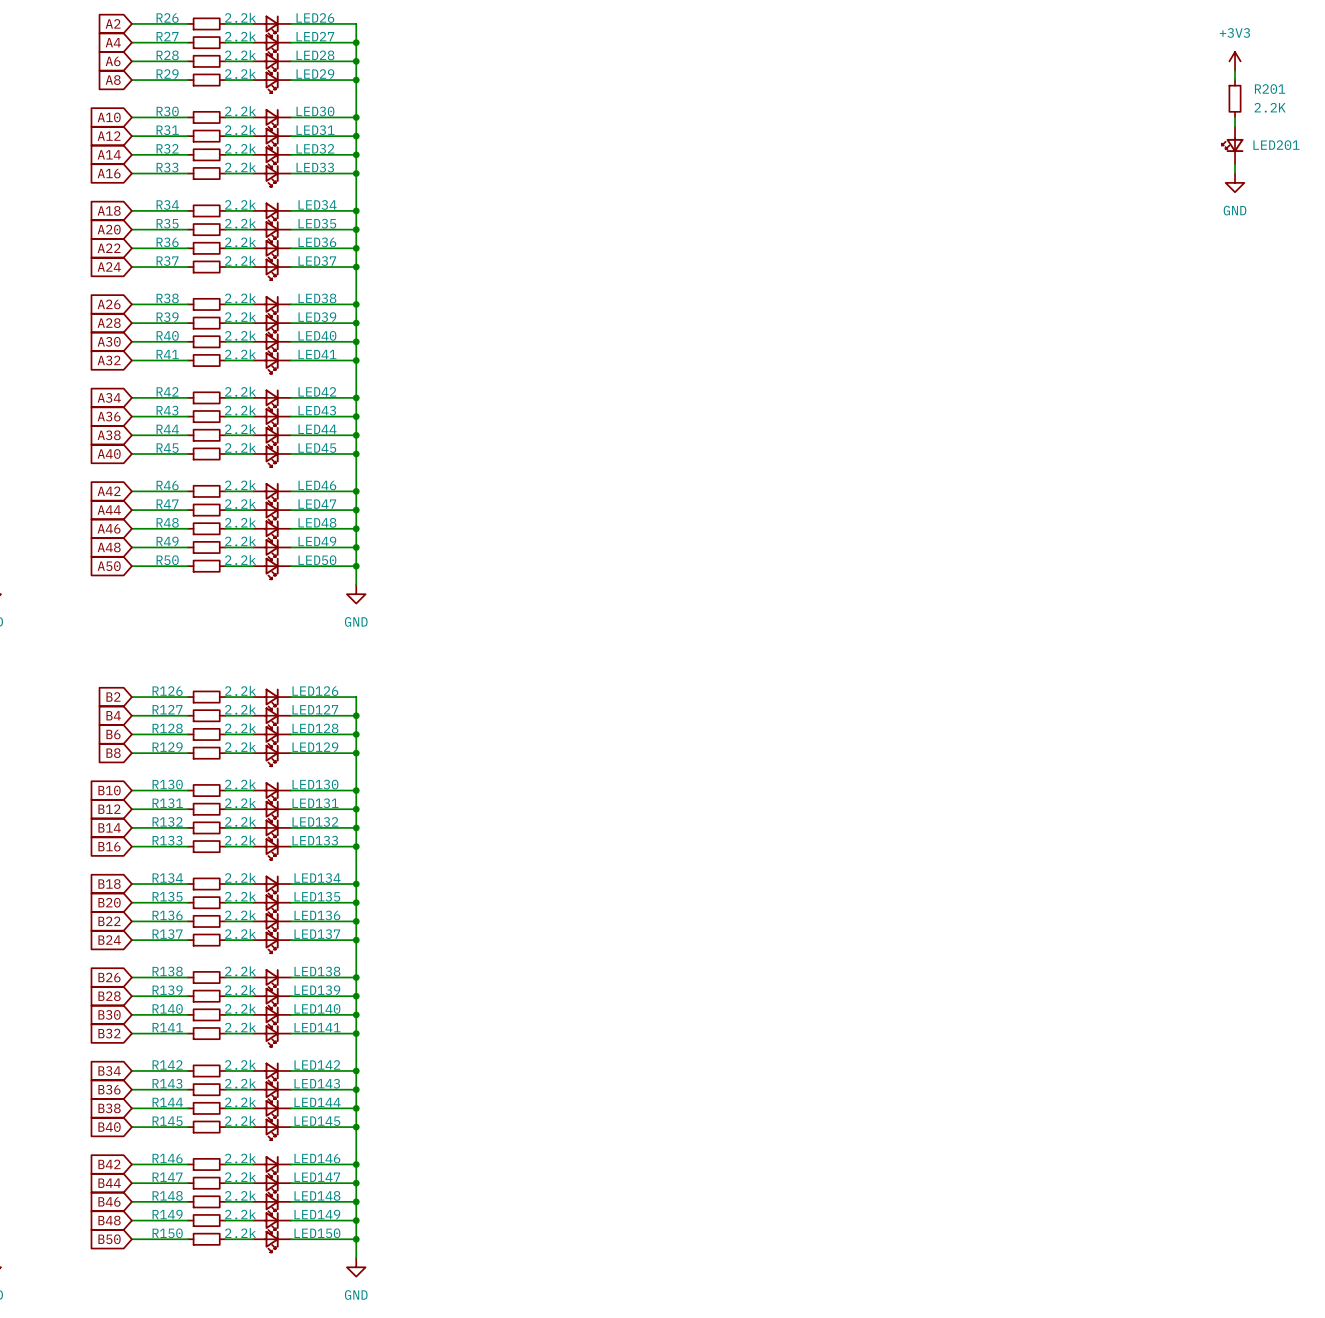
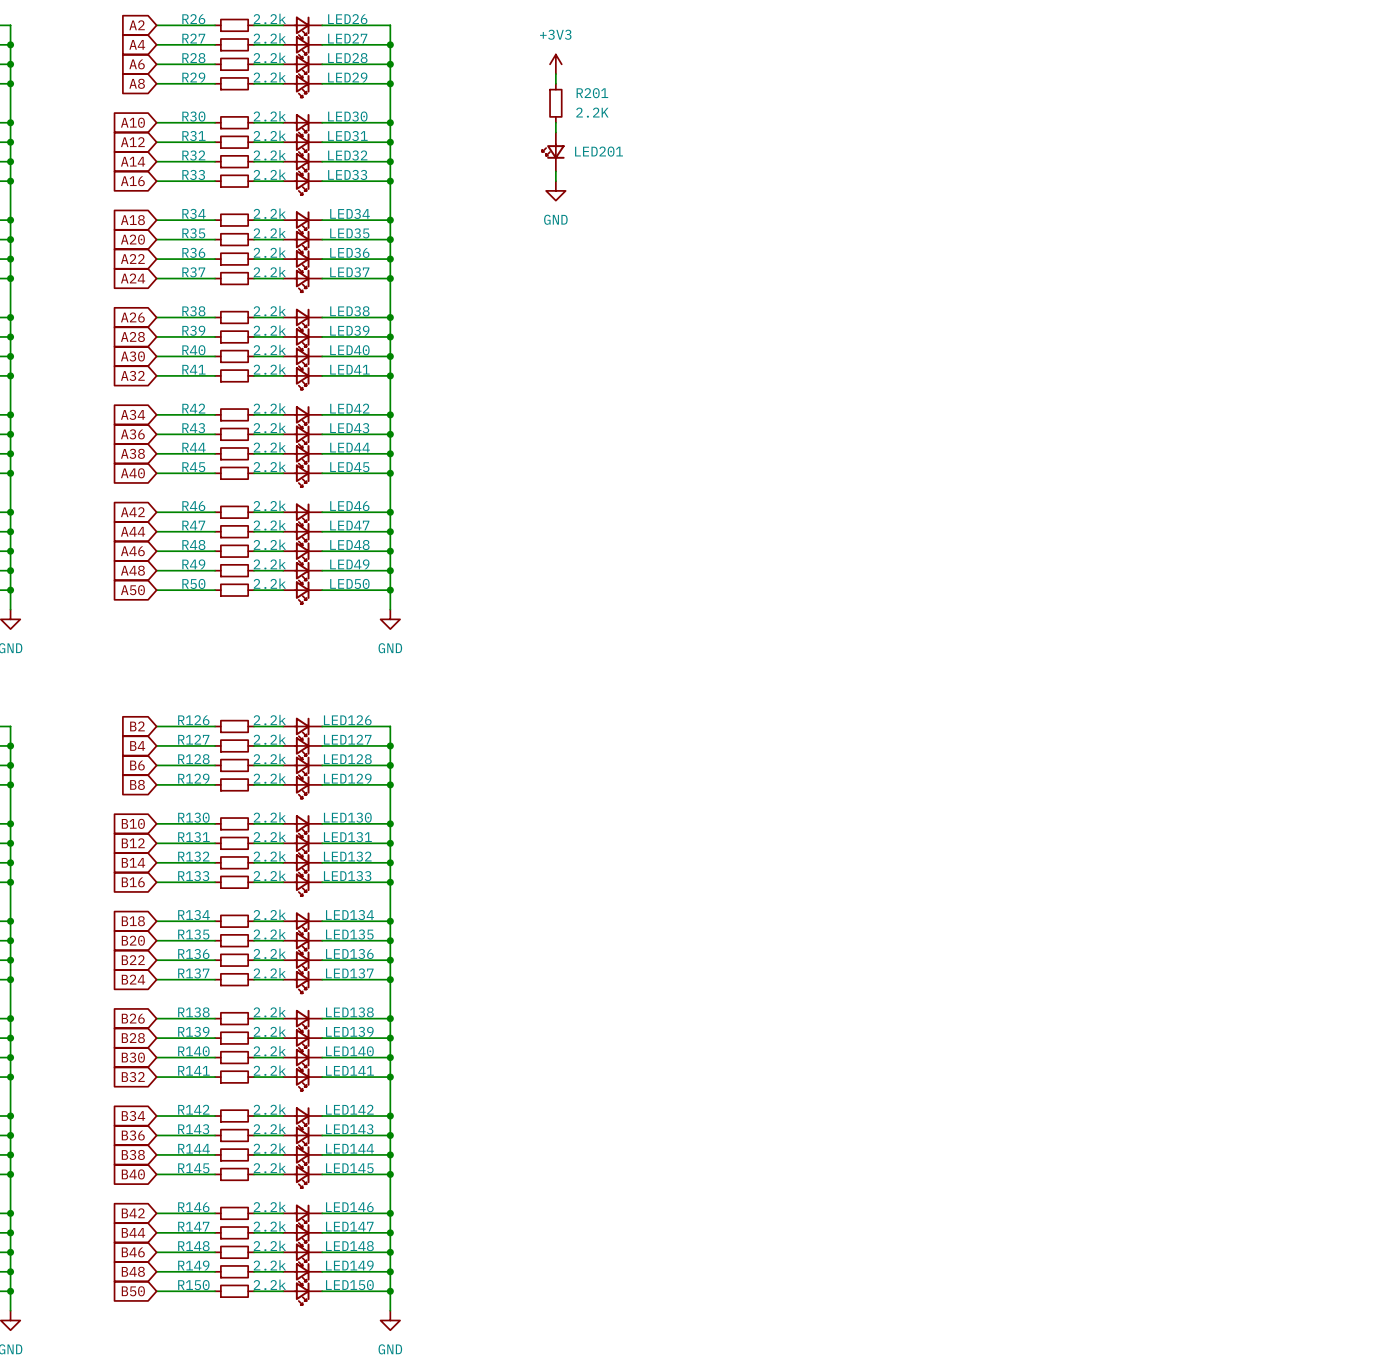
power symbol: none -> +3V3 (555, 64)
power symbol: +3V3 (1235, 61) -> none
wire: none -> (555, 74) (555, 83)
wire: (1235, 70) (1235, 80) -> none
R201 position: (1235, 98) -> (555, 103)
wire: none -> (555, 122) (555, 132)
wire: (1235, 117) (1235, 126) -> none
LED201 position: (1232, 145) -> (553, 151)
wire: none -> (555, 171) (555, 181)
wire: (1235, 164) (1235, 173) -> none
power symbol: none -> GND (555, 190)
power symbol: GND (1235, 182) -> none

